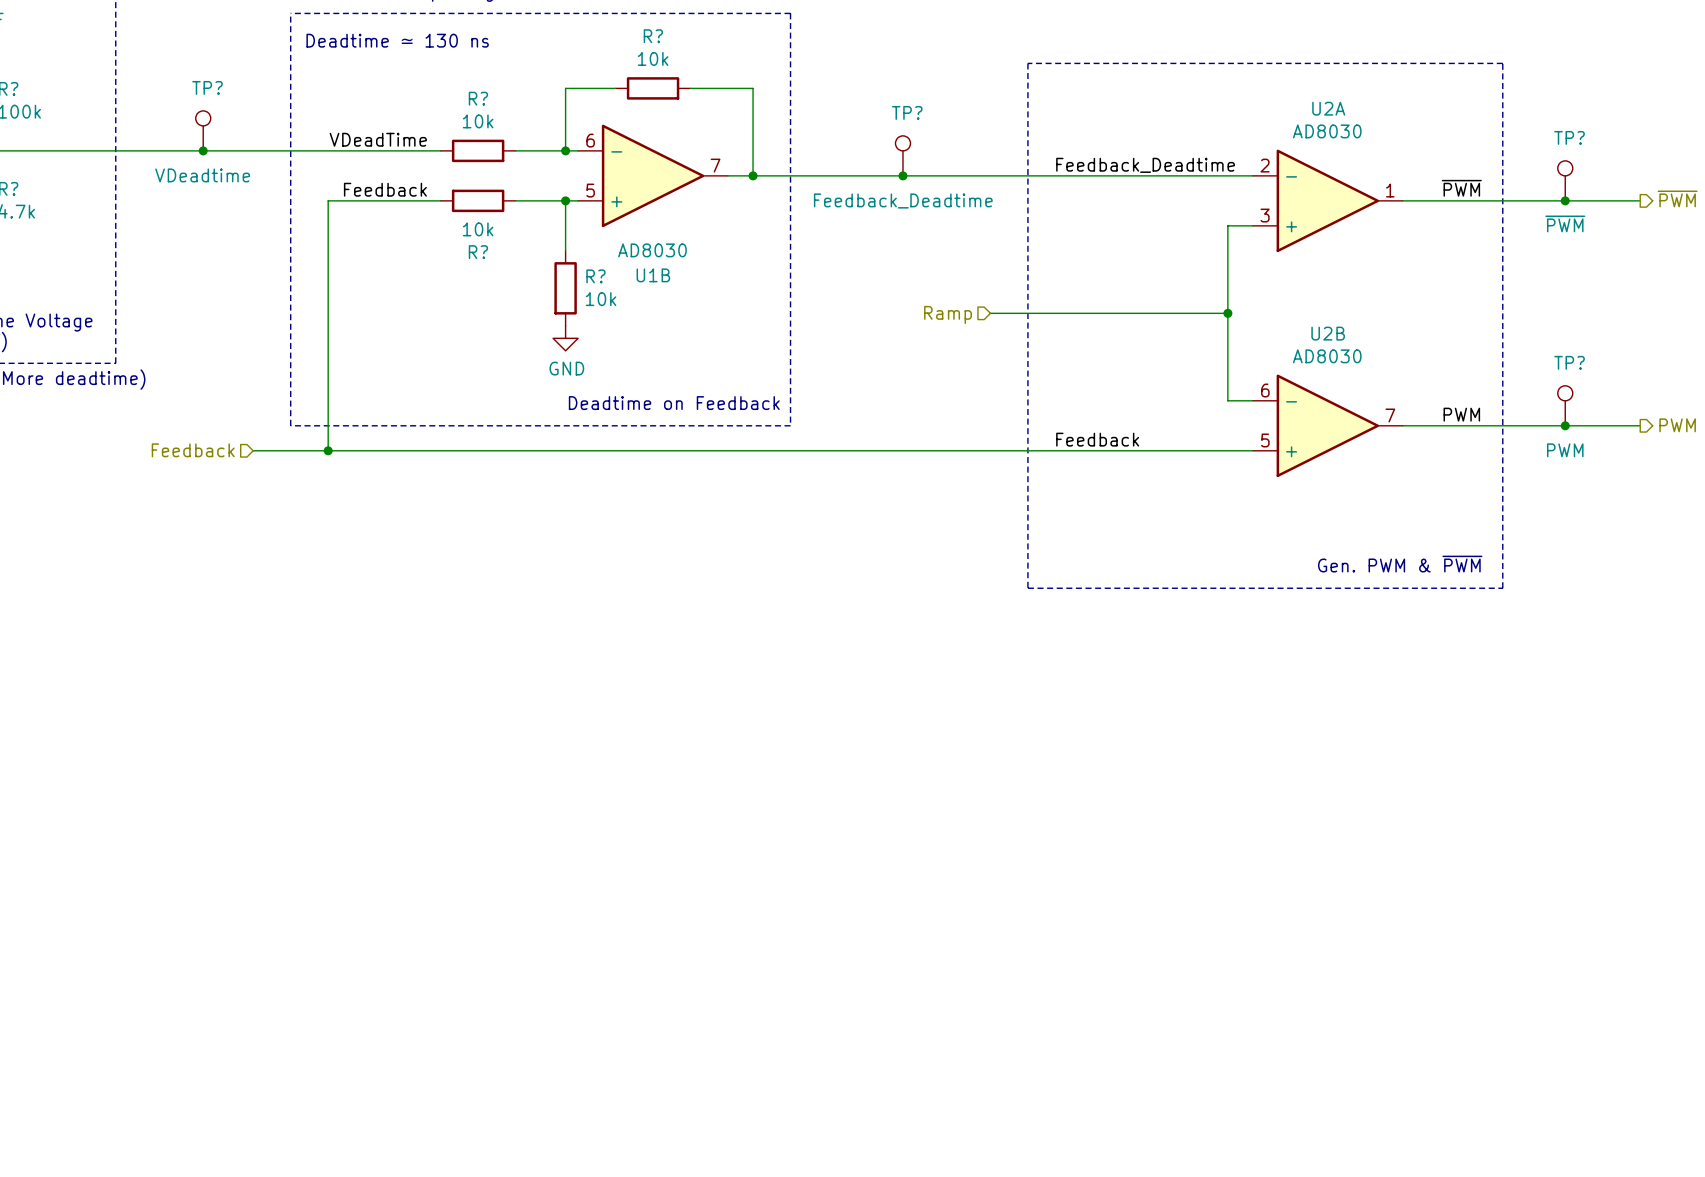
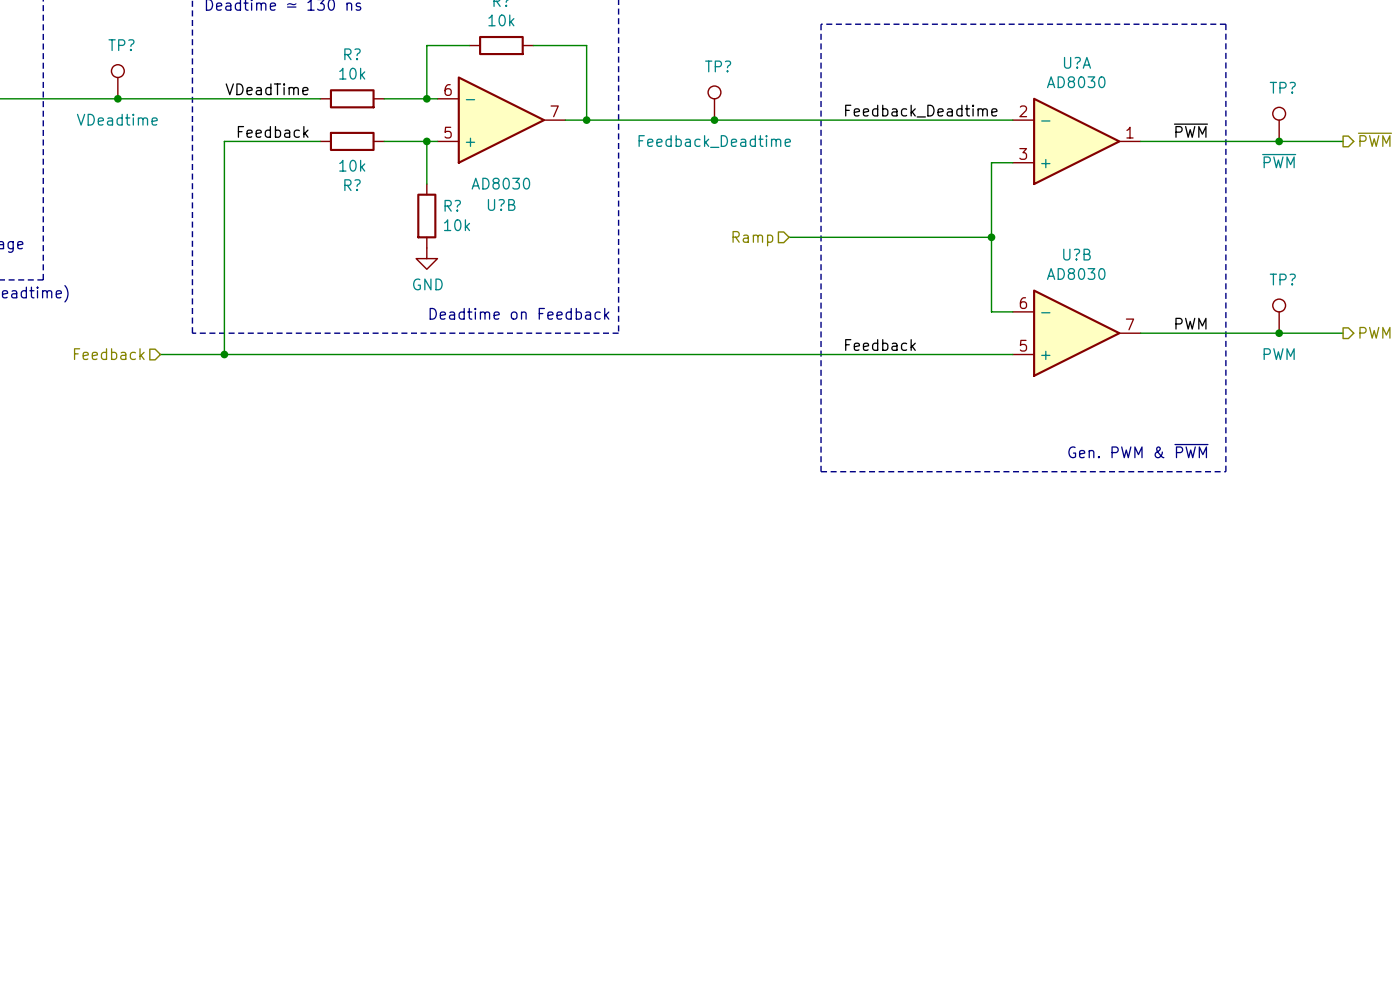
U2A name: U2A (1328, 108) -> U?A (1077, 62)
U1B name: U1B (653, 275) -> U?B (501, 204)
U2B name: U2B (1328, 333) -> U?B (1076, 254)

